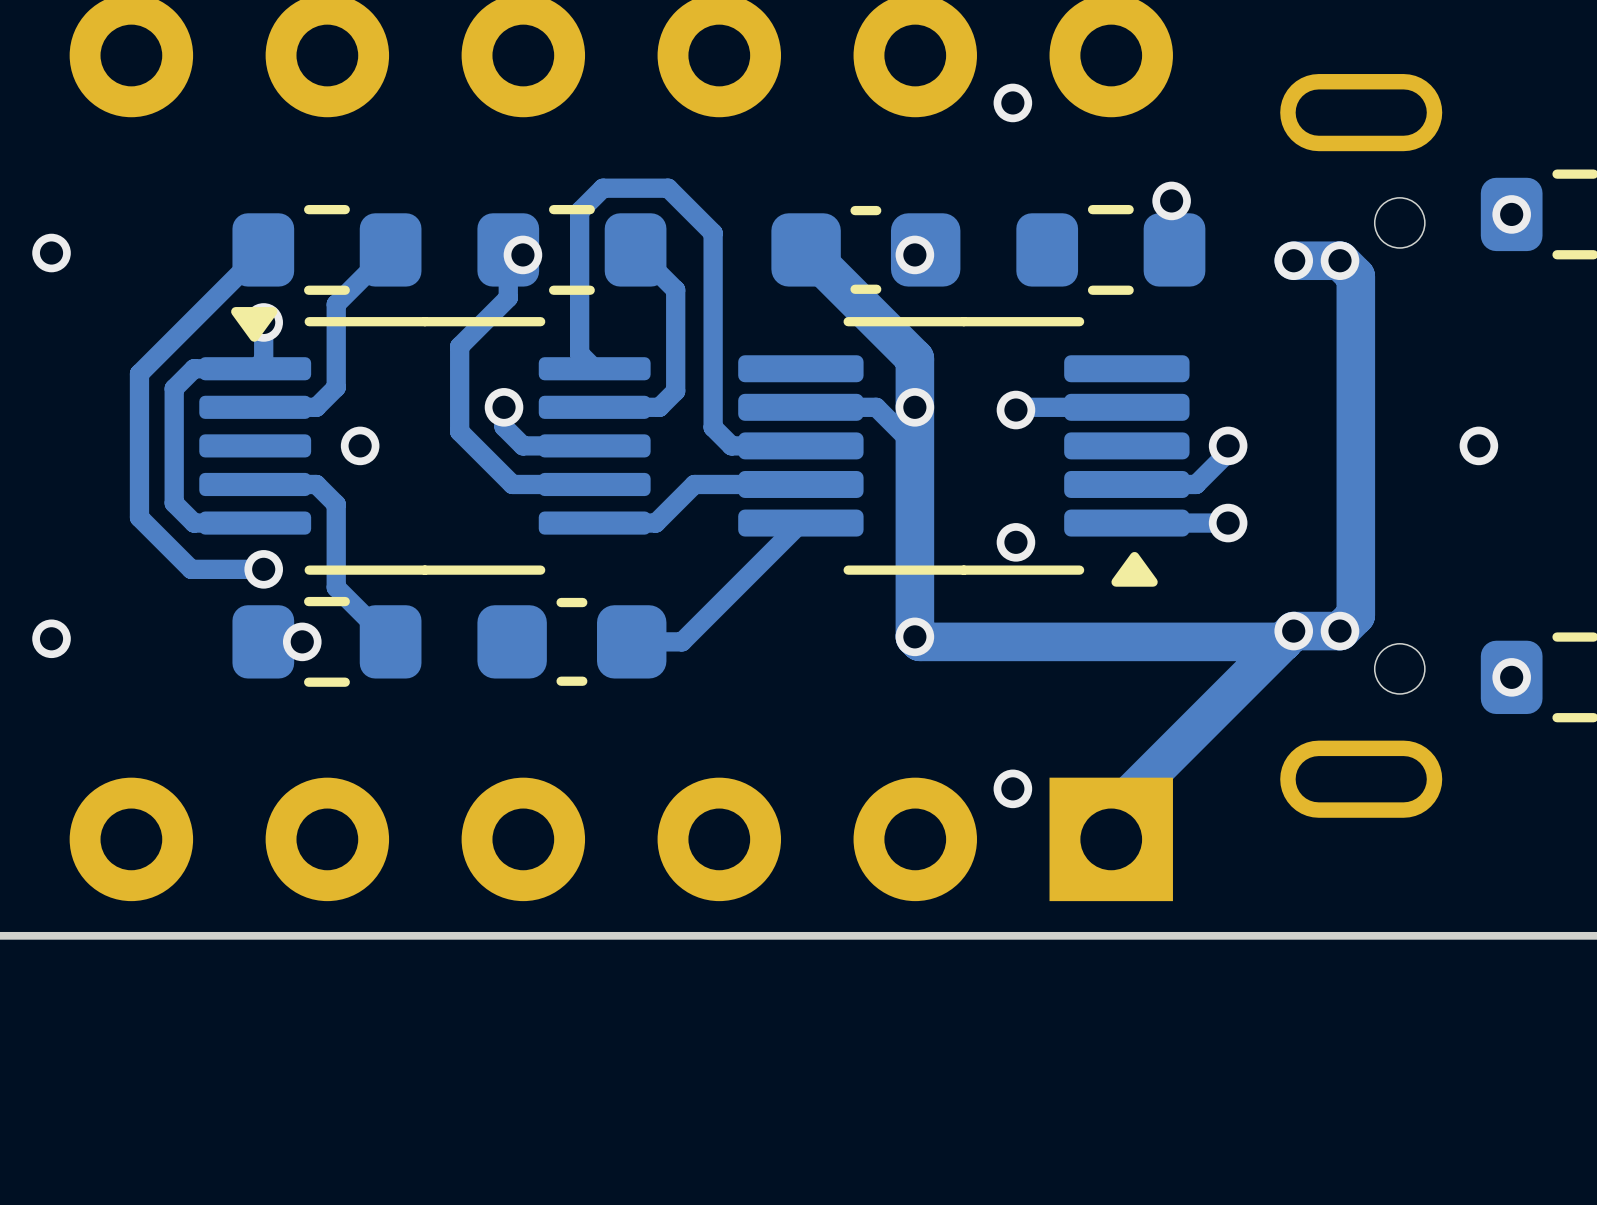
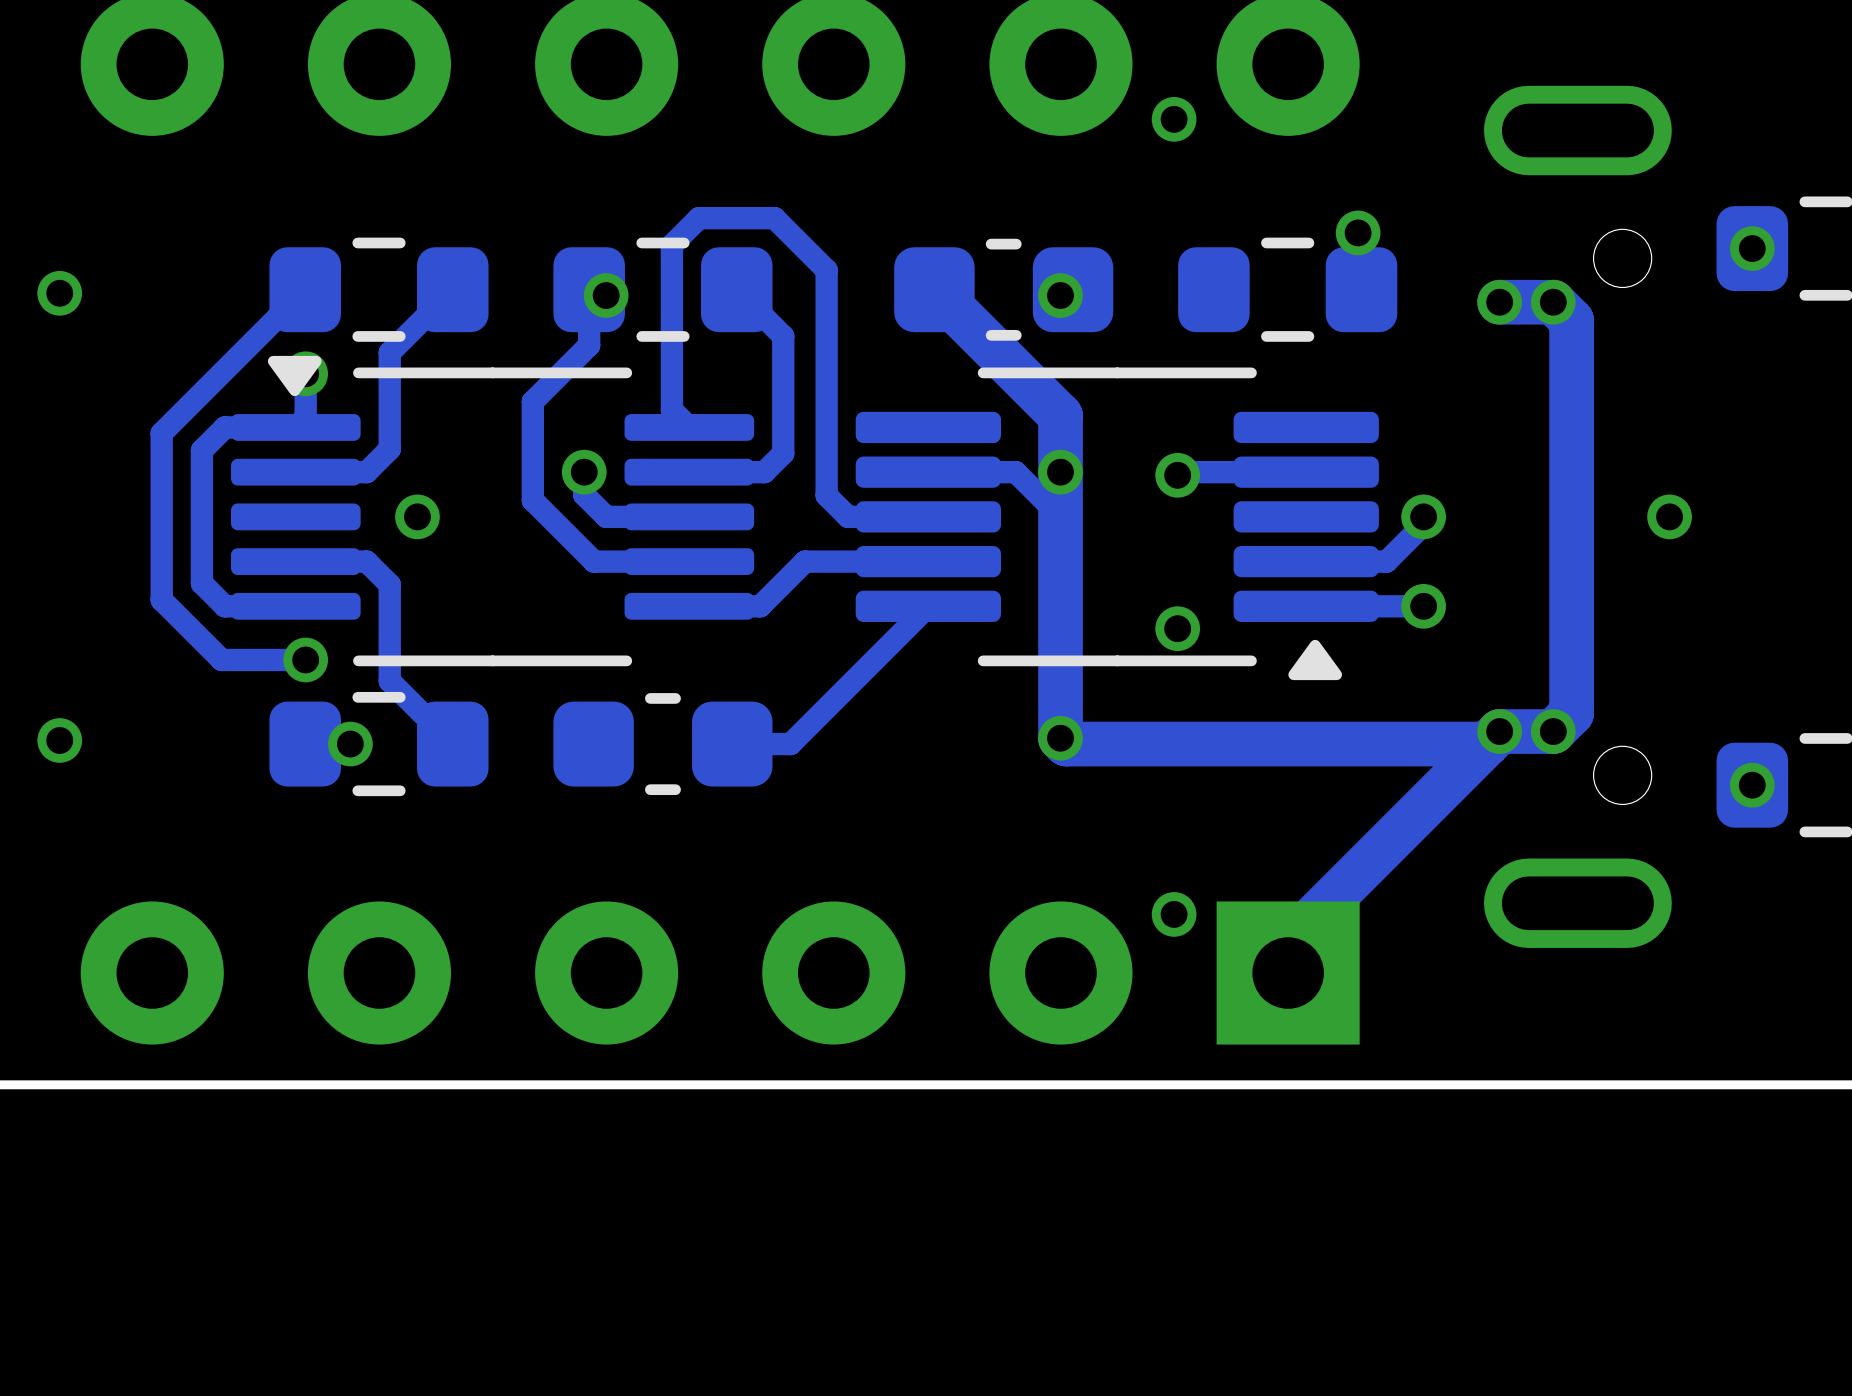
via position: (1478, 445) -> (1669, 516)

